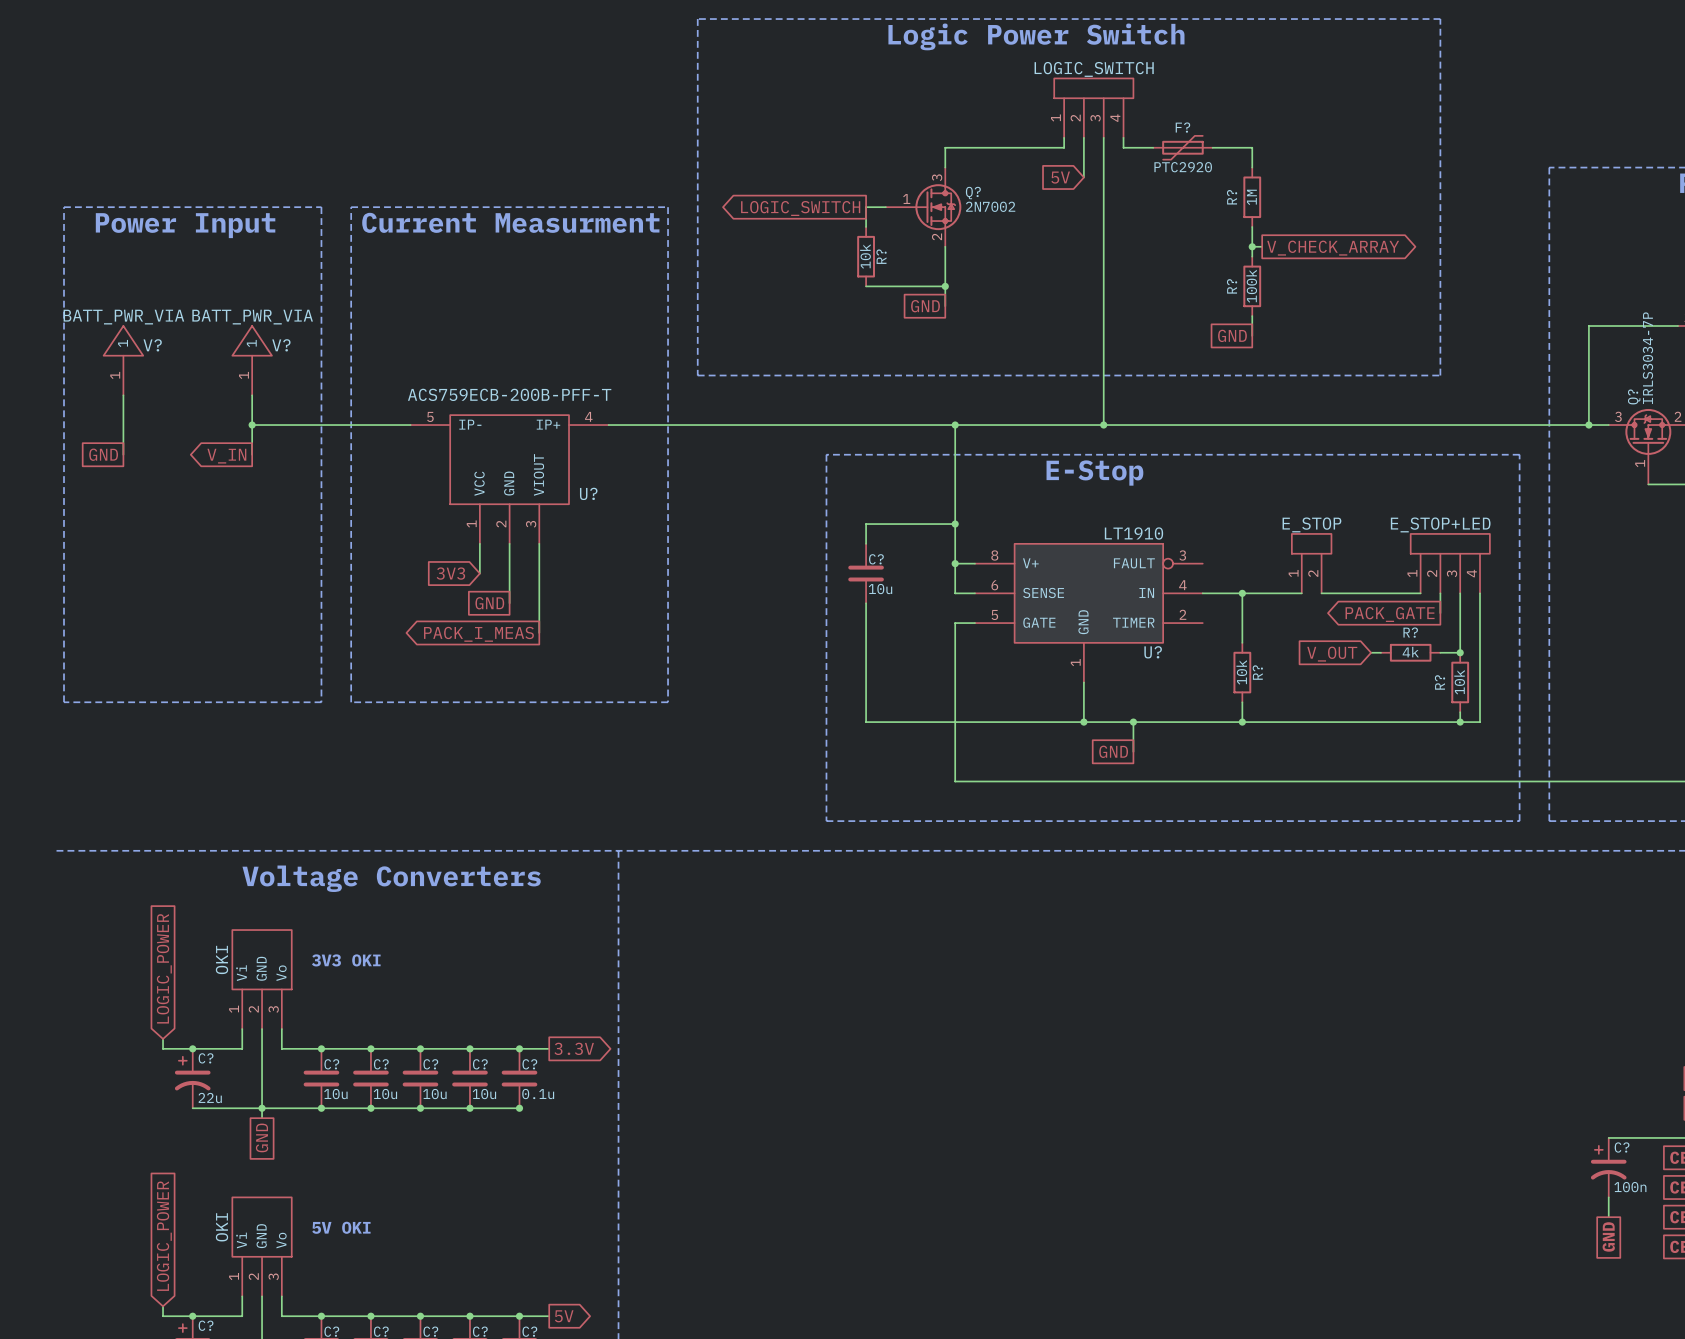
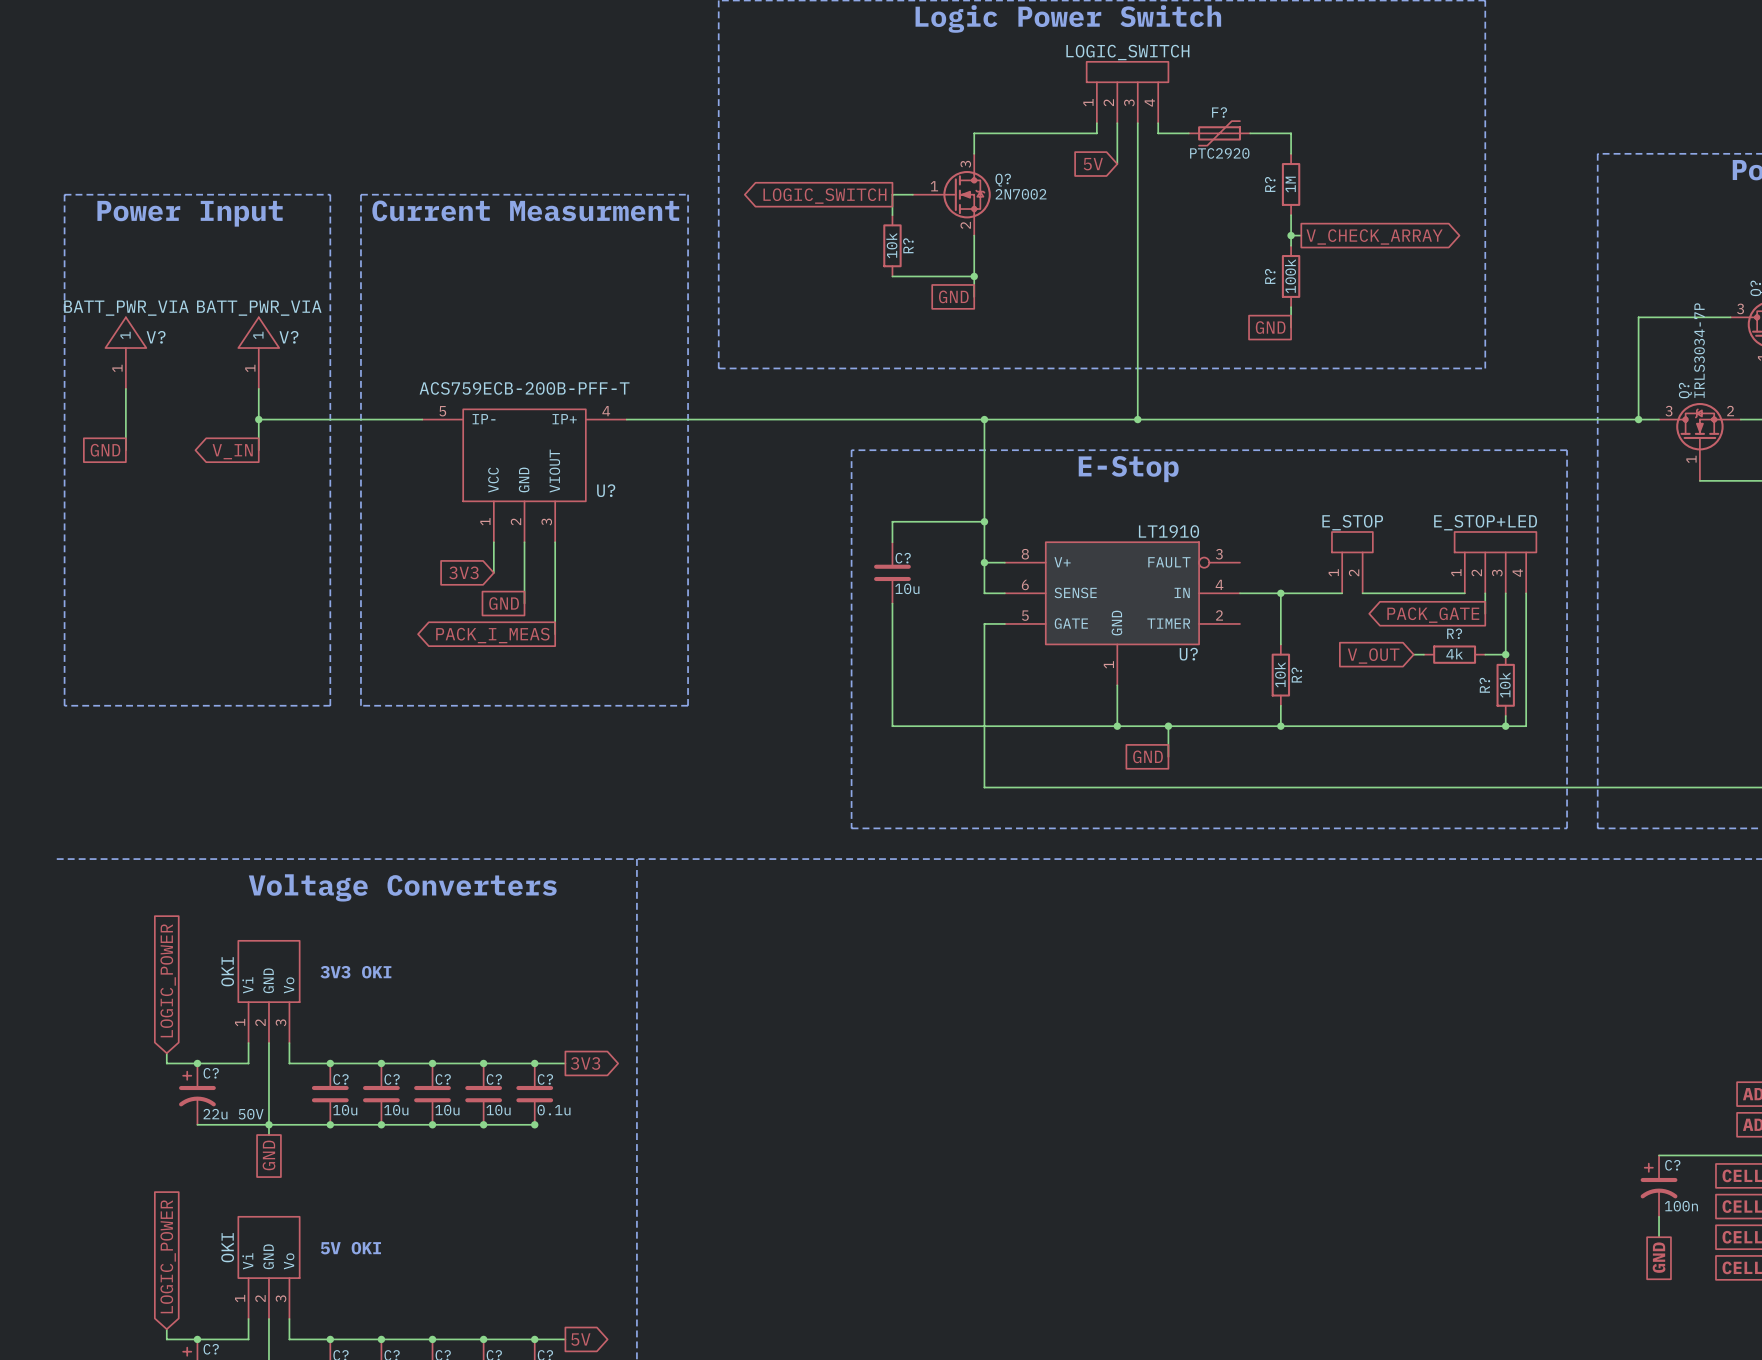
global label: 3.3V (574, 1048) -> 3V3 (585, 1063)
C? value: 22u (210, 1097) -> 22u 50V (233, 1114)

